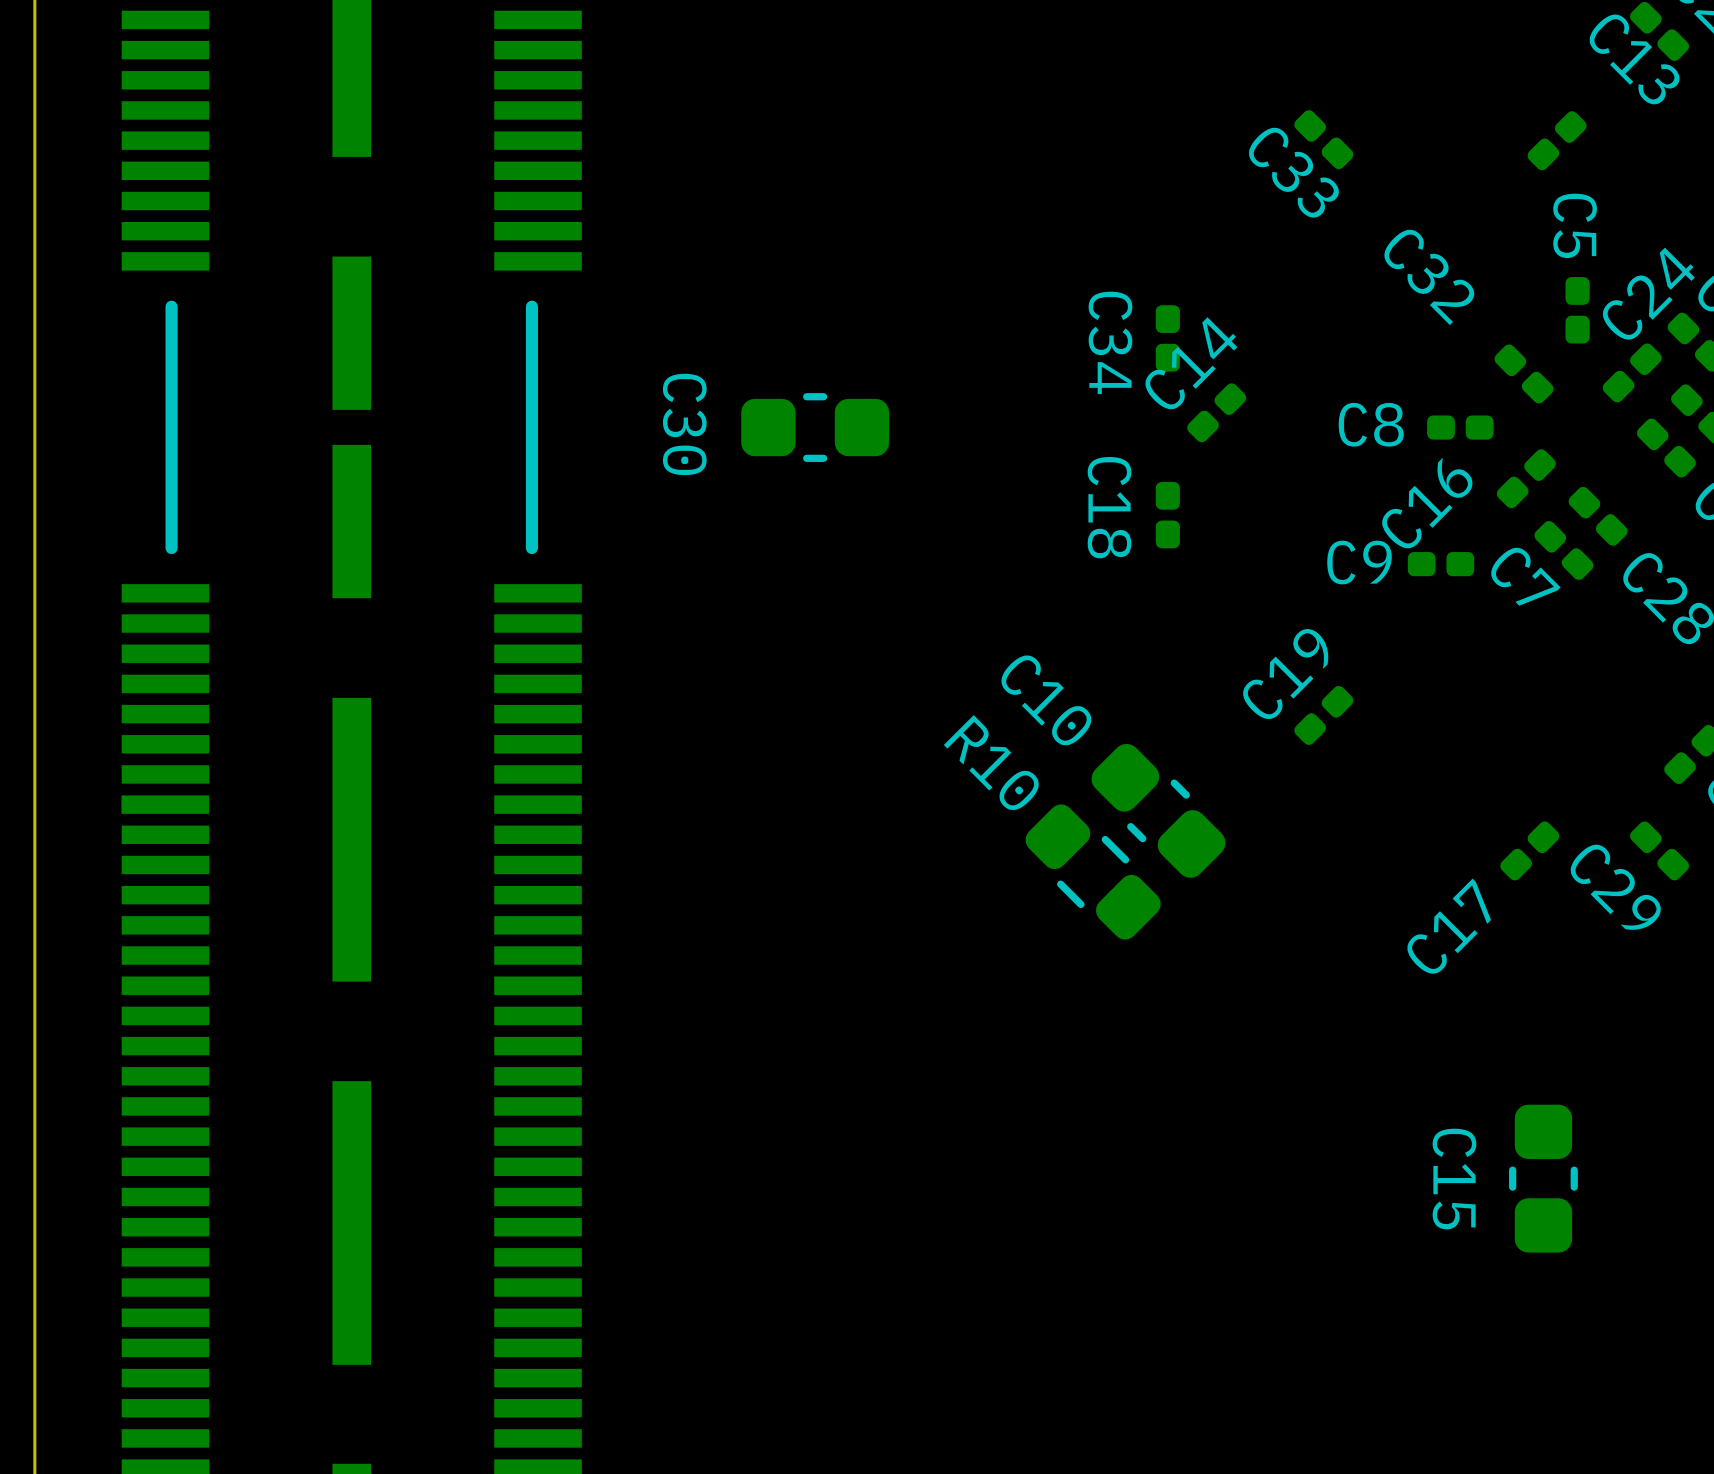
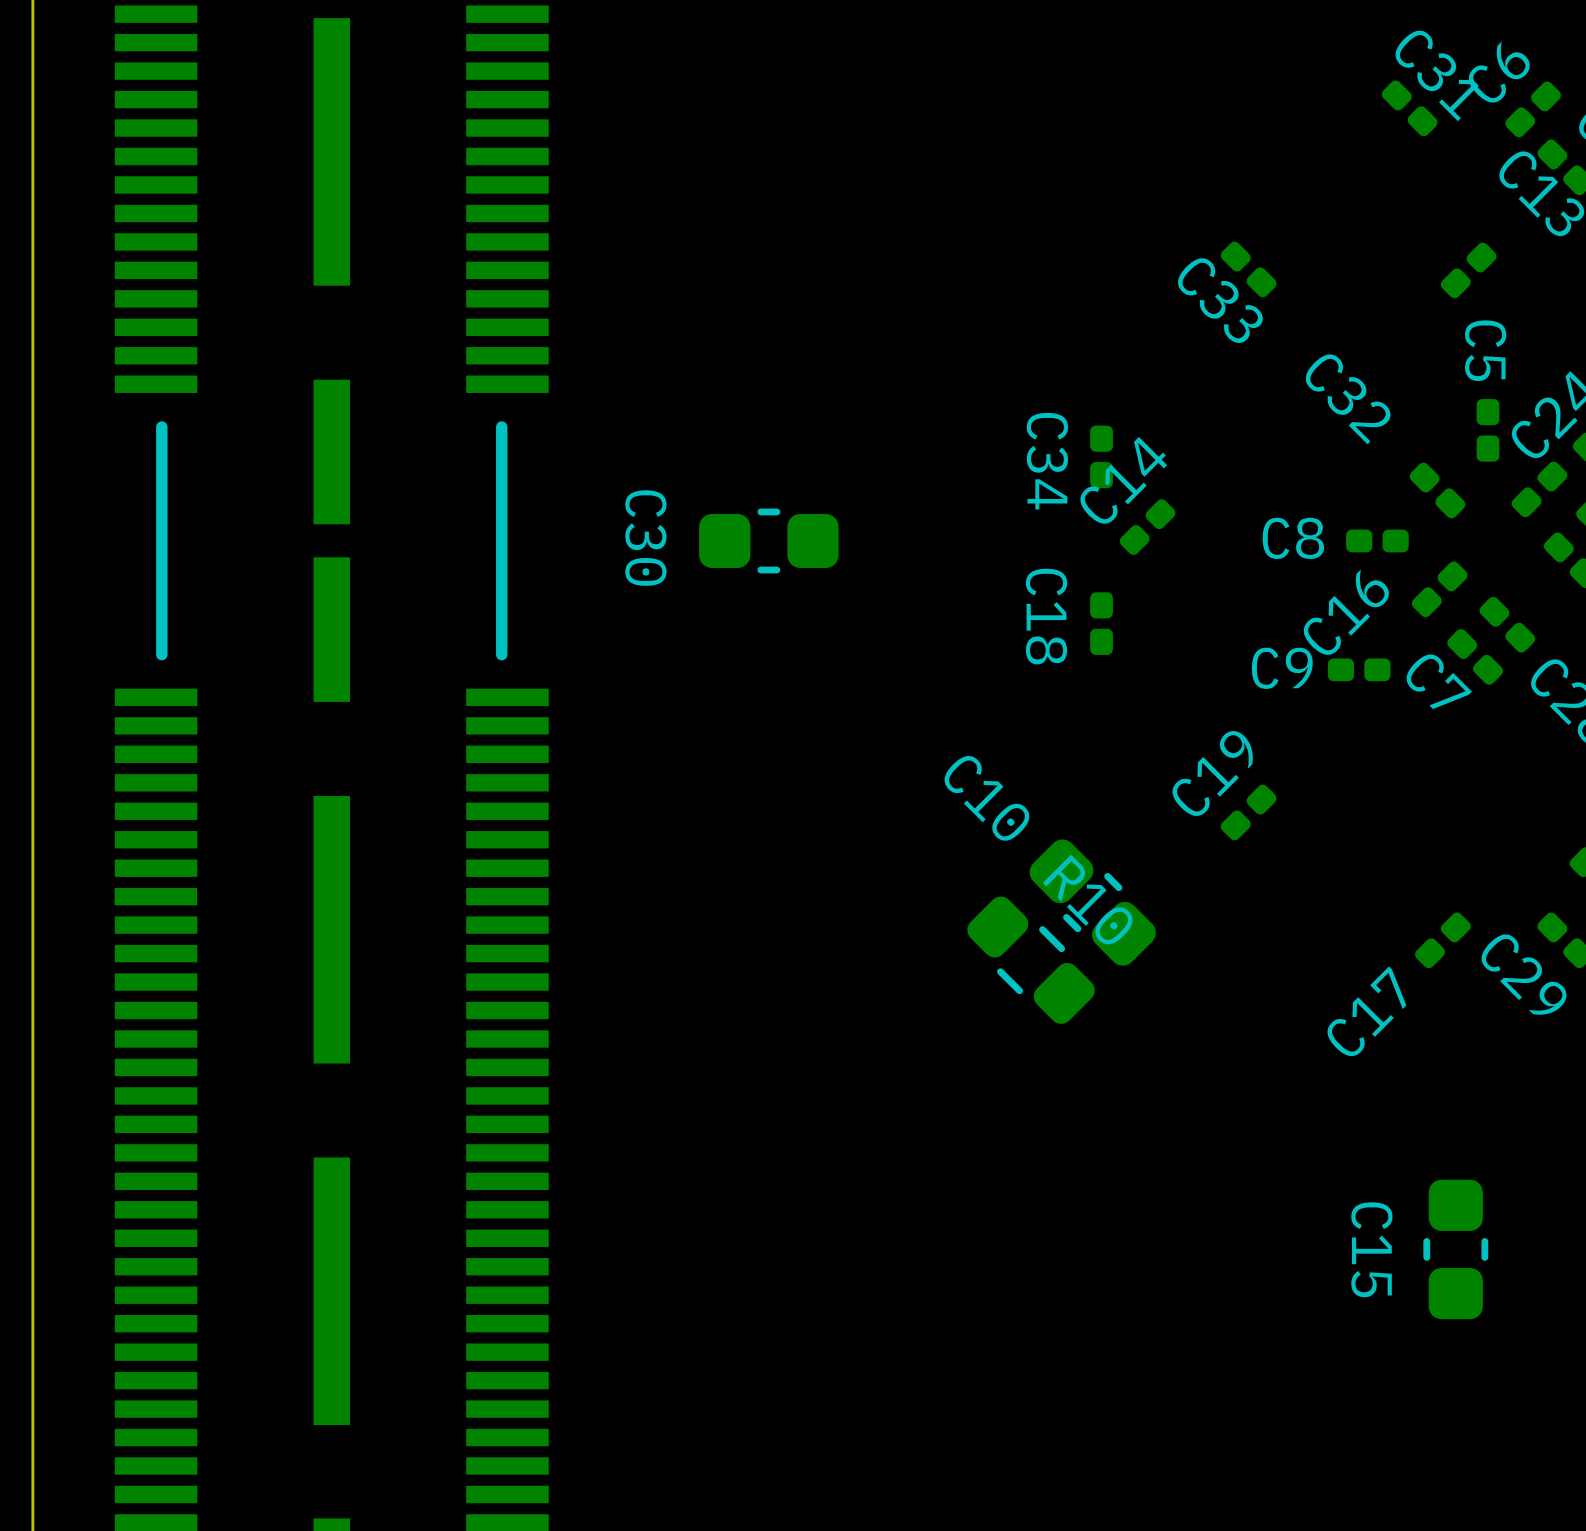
R10 name position: R10 (991, 762) -> R10 (1087, 899)

